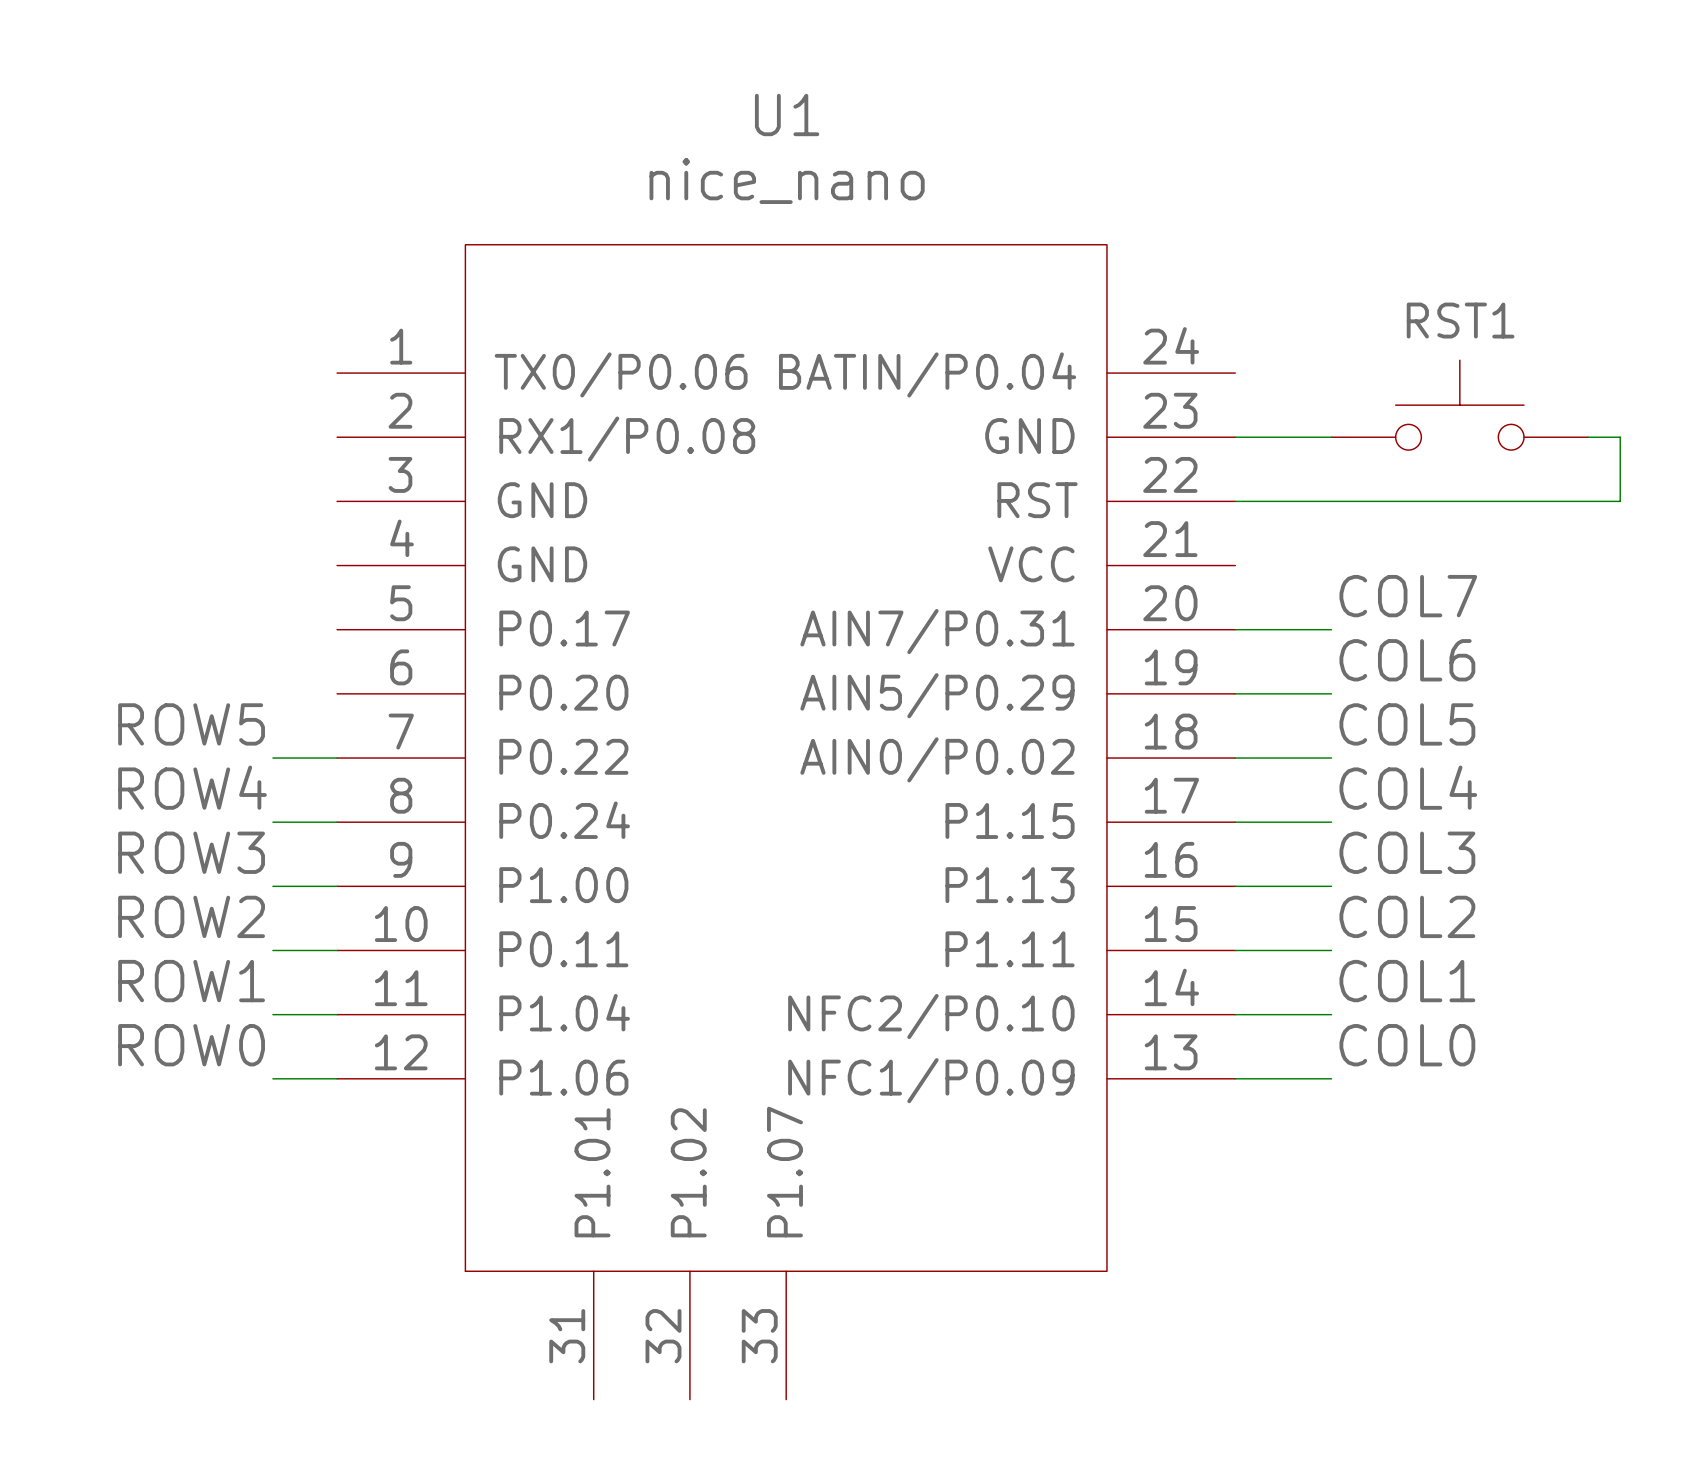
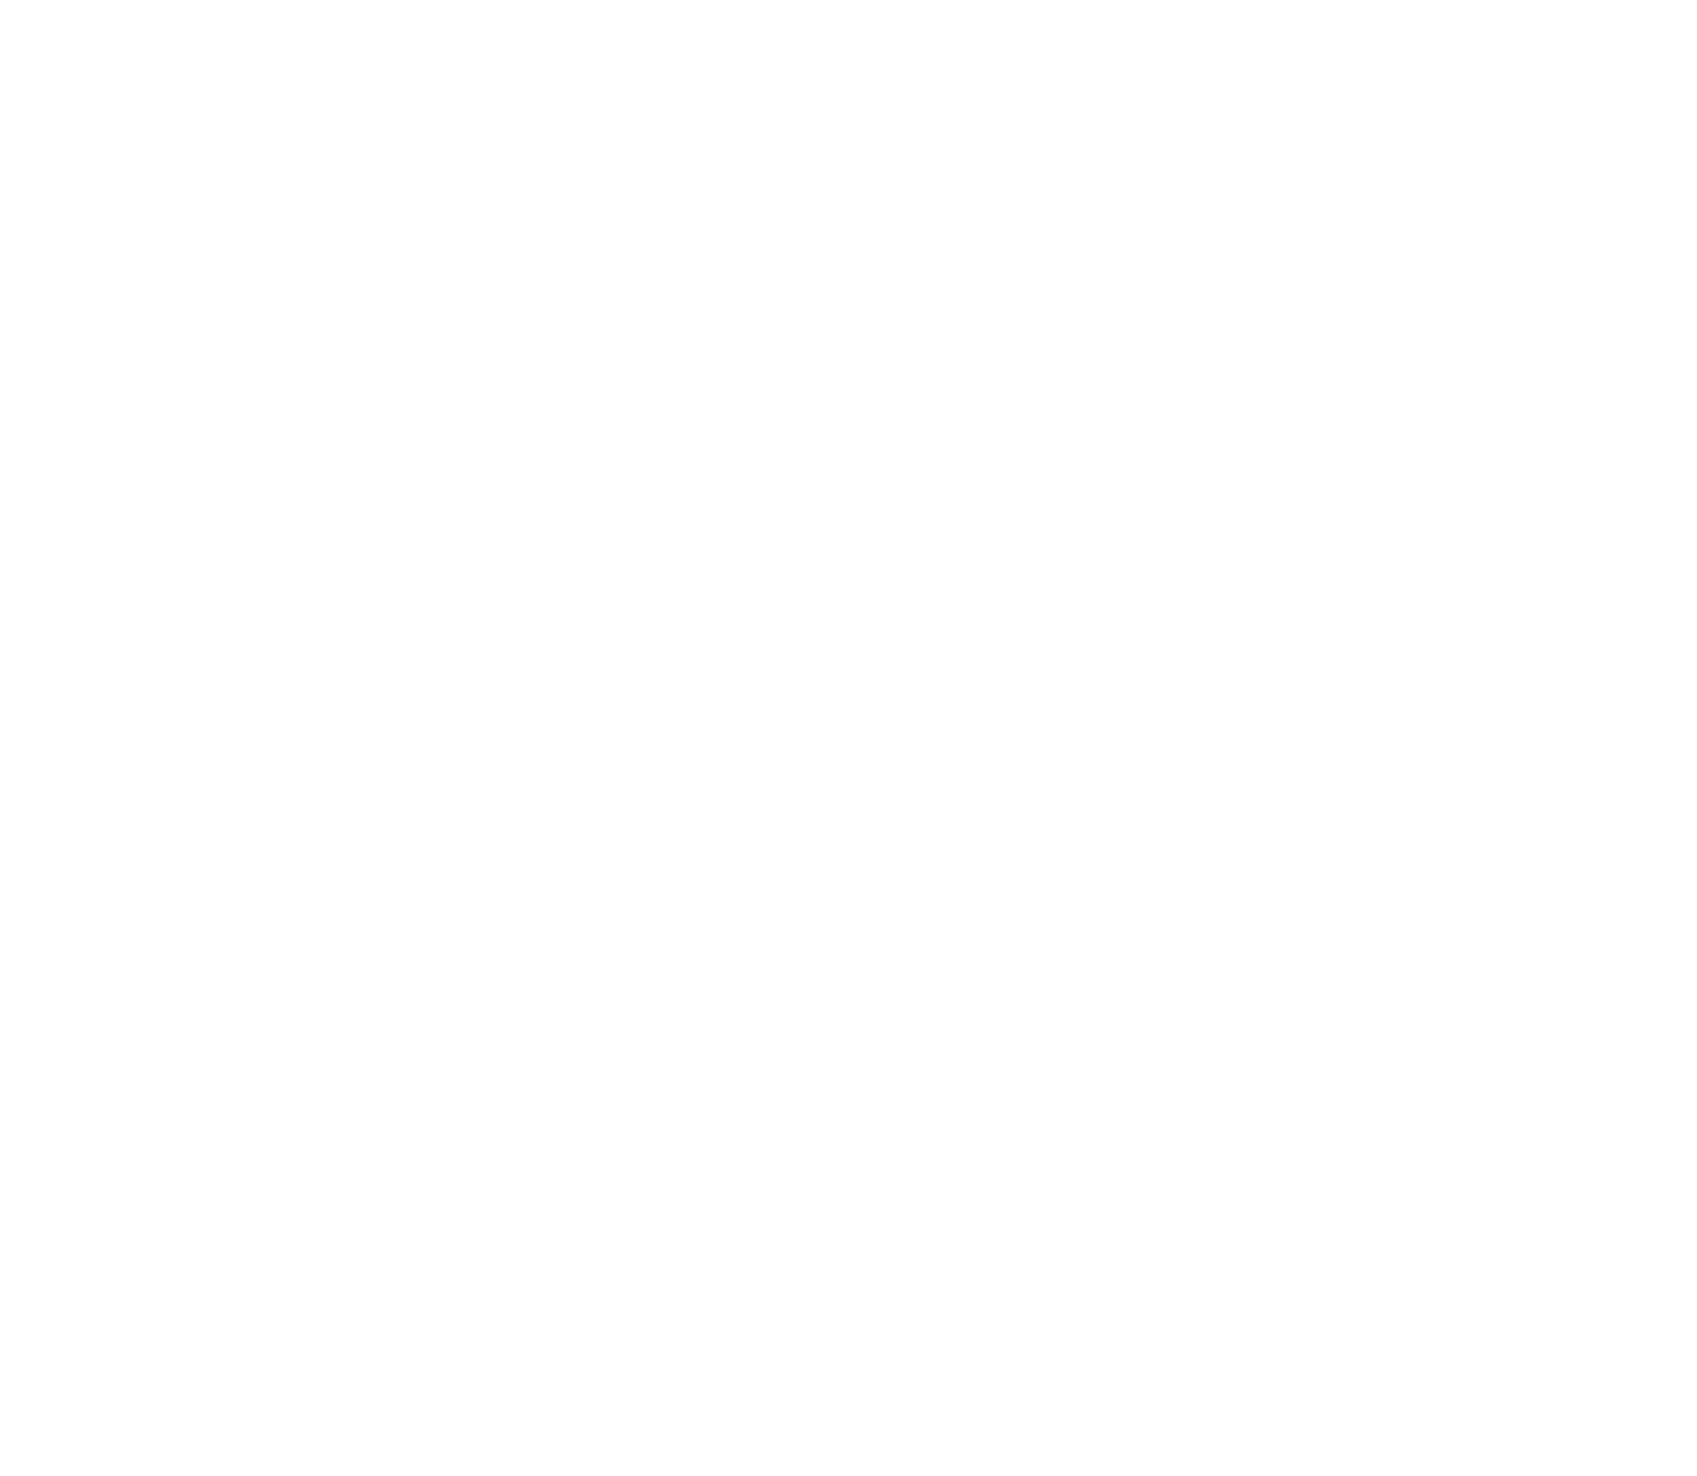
RST1: (1459, 405) -> none
wire: (1235, 437) (1331, 437) -> none
wire: (1588, 437) (1620, 437) (1620, 501) (1235, 501) -> none
label: COL7 (1408, 596) -> none
wire: (1235, 629) (1331, 629) -> none
label: COL6 (1407, 660) -> none
wire: (1235, 693) (1331, 693) -> none
label: ROW5 (191, 724) -> none
label: COL5 (1407, 724) -> none
wire: (272, 758) (337, 758) -> none
wire: (1235, 758) (1331, 758) -> none
label: ROW4 (192, 787) -> none
label: COL4 (1408, 787) -> none
wire: (272, 822) (337, 822) -> none
U1: nice_nano (786, 822) -> none
wire: (1235, 822) (1331, 822) -> none
label: ROW3 (191, 852) -> none
label: COL3 (1407, 852) -> none
wire: (272, 886) (337, 886) -> none
wire: (1235, 886) (1331, 886) -> none
label: ROW2 (191, 916) -> none
label: COL2 (1407, 916) -> none
wire: (272, 950) (337, 950) -> none
wire: (1235, 950) (1331, 950) -> none
label: ROW1 (191, 981) -> none
label: COL1 (1407, 981) -> none
wire: (272, 1014) (337, 1014) -> none
wire: (1235, 1014) (1331, 1014) -> none
label: ROW0 (191, 1045) -> none
label: COL0 (1407, 1045) -> none
wire: (272, 1078) (337, 1078) -> none
wire: (1235, 1078) (1331, 1078) -> none

